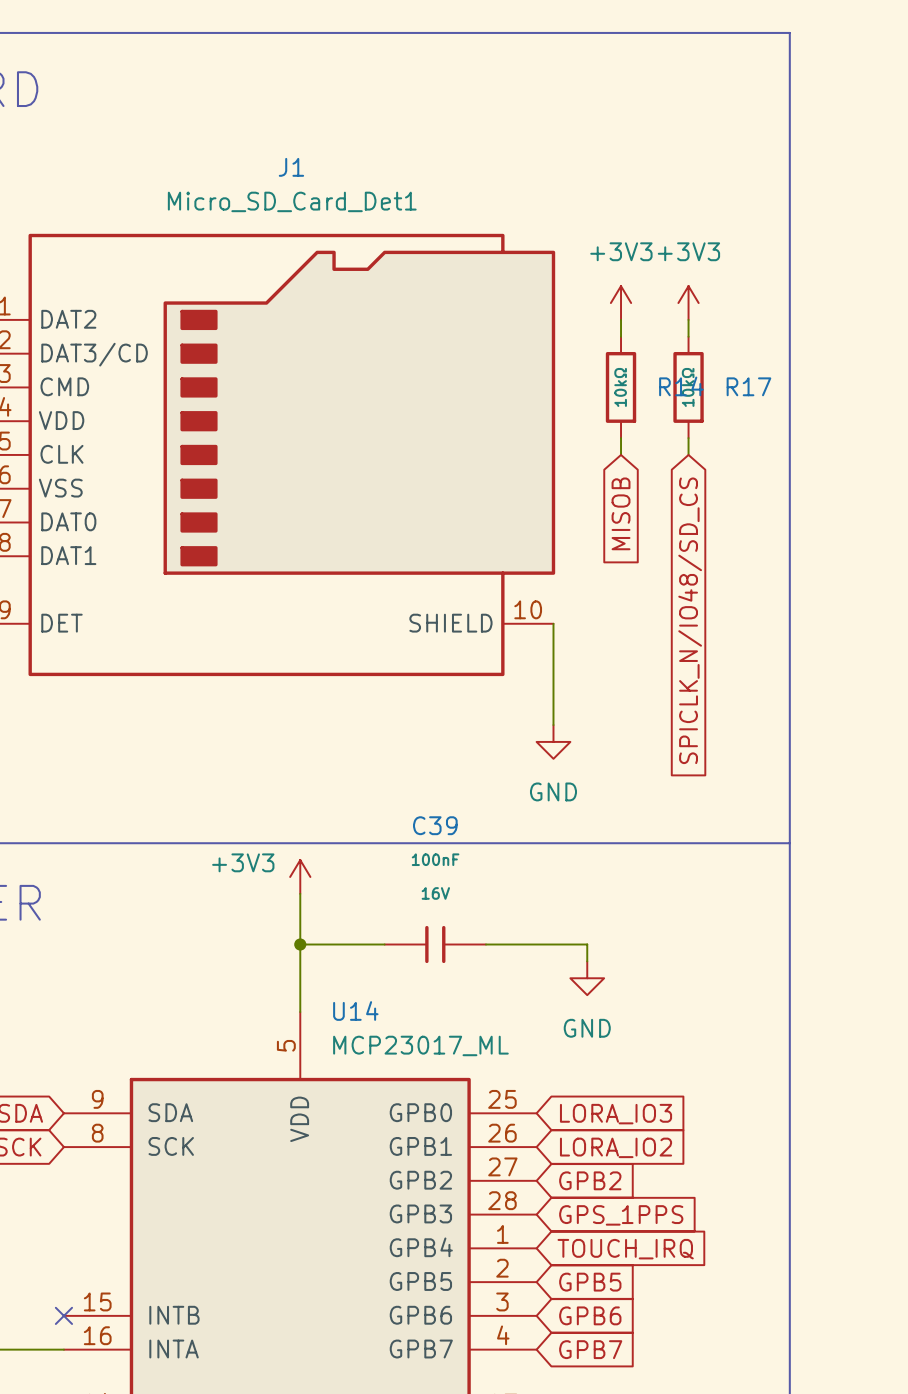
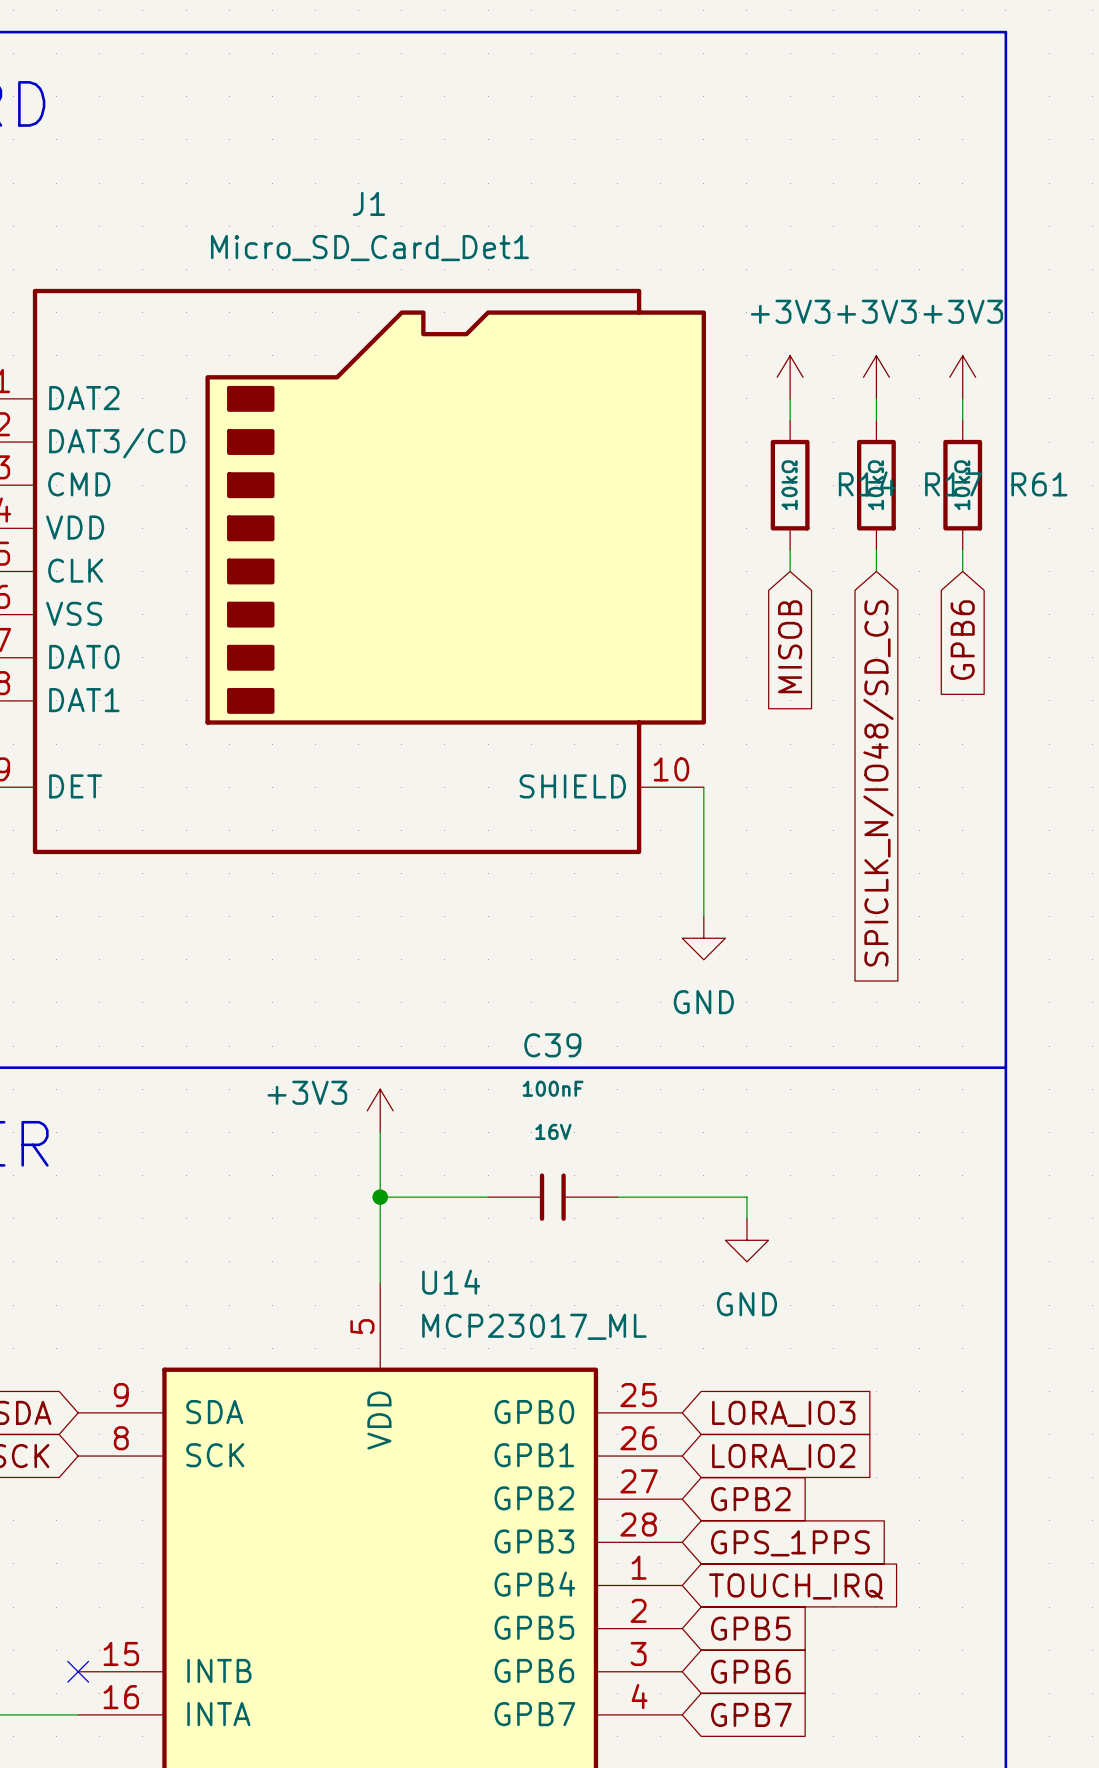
power symbol: none -> +3V3 (962, 377)
wire: none -> (962, 398) (962, 420)
R61: none -> 10kΩ (962, 485)
wire: none -> (962, 549) (962, 571)
global label: none -> GPB6 (962, 640)

